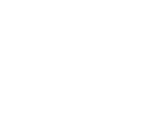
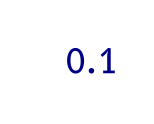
text: none -> 0.1 (90, 60)

